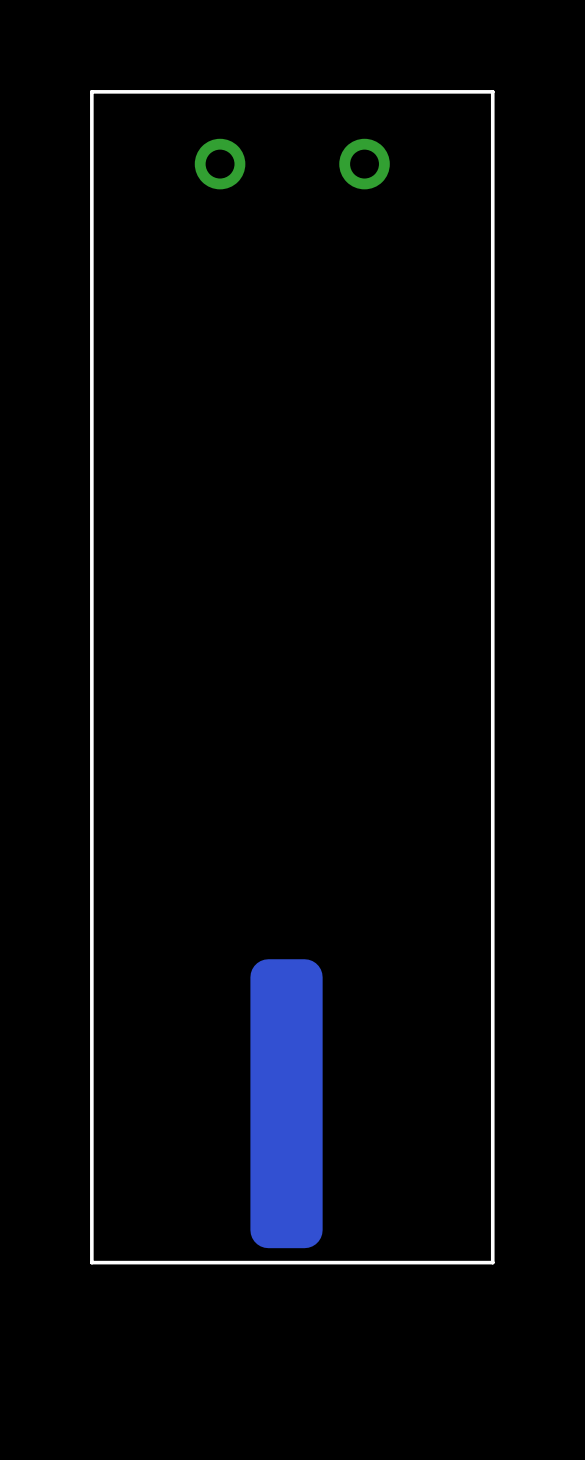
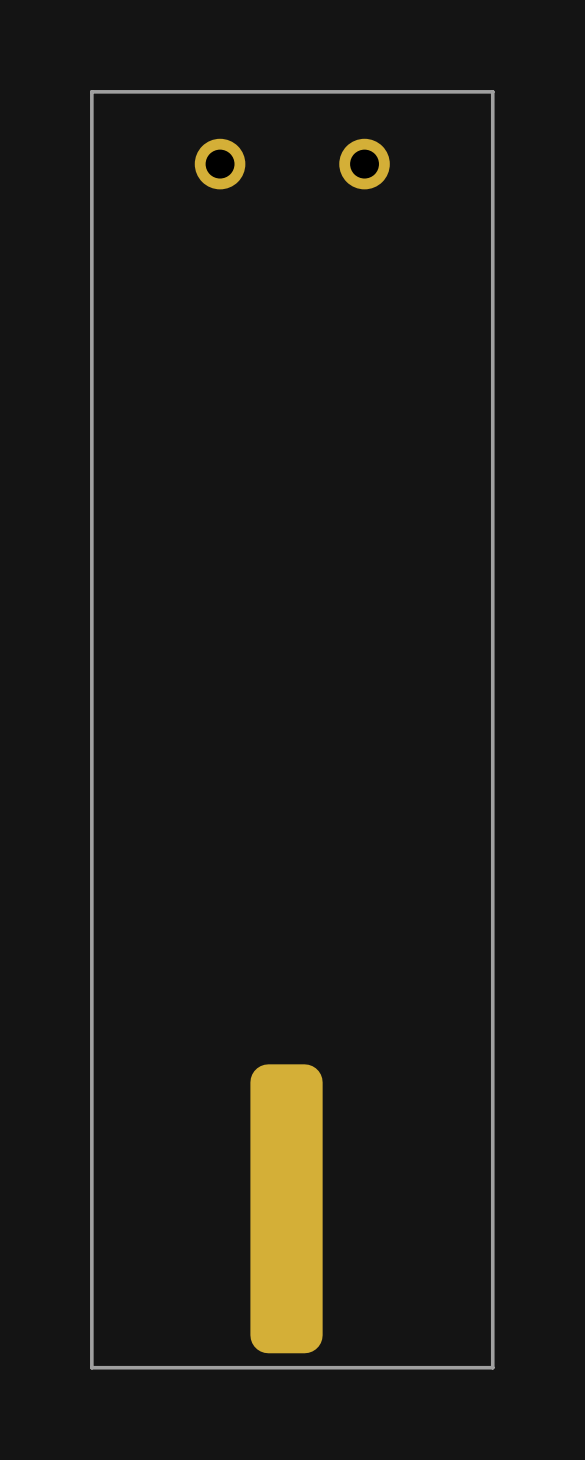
part position: (286, 1103) -> (286, 1208)
board edge: (492, 1262) (91, 1262) -> (492, 1262) (492, 1367) (91, 1367) (91, 1262)

